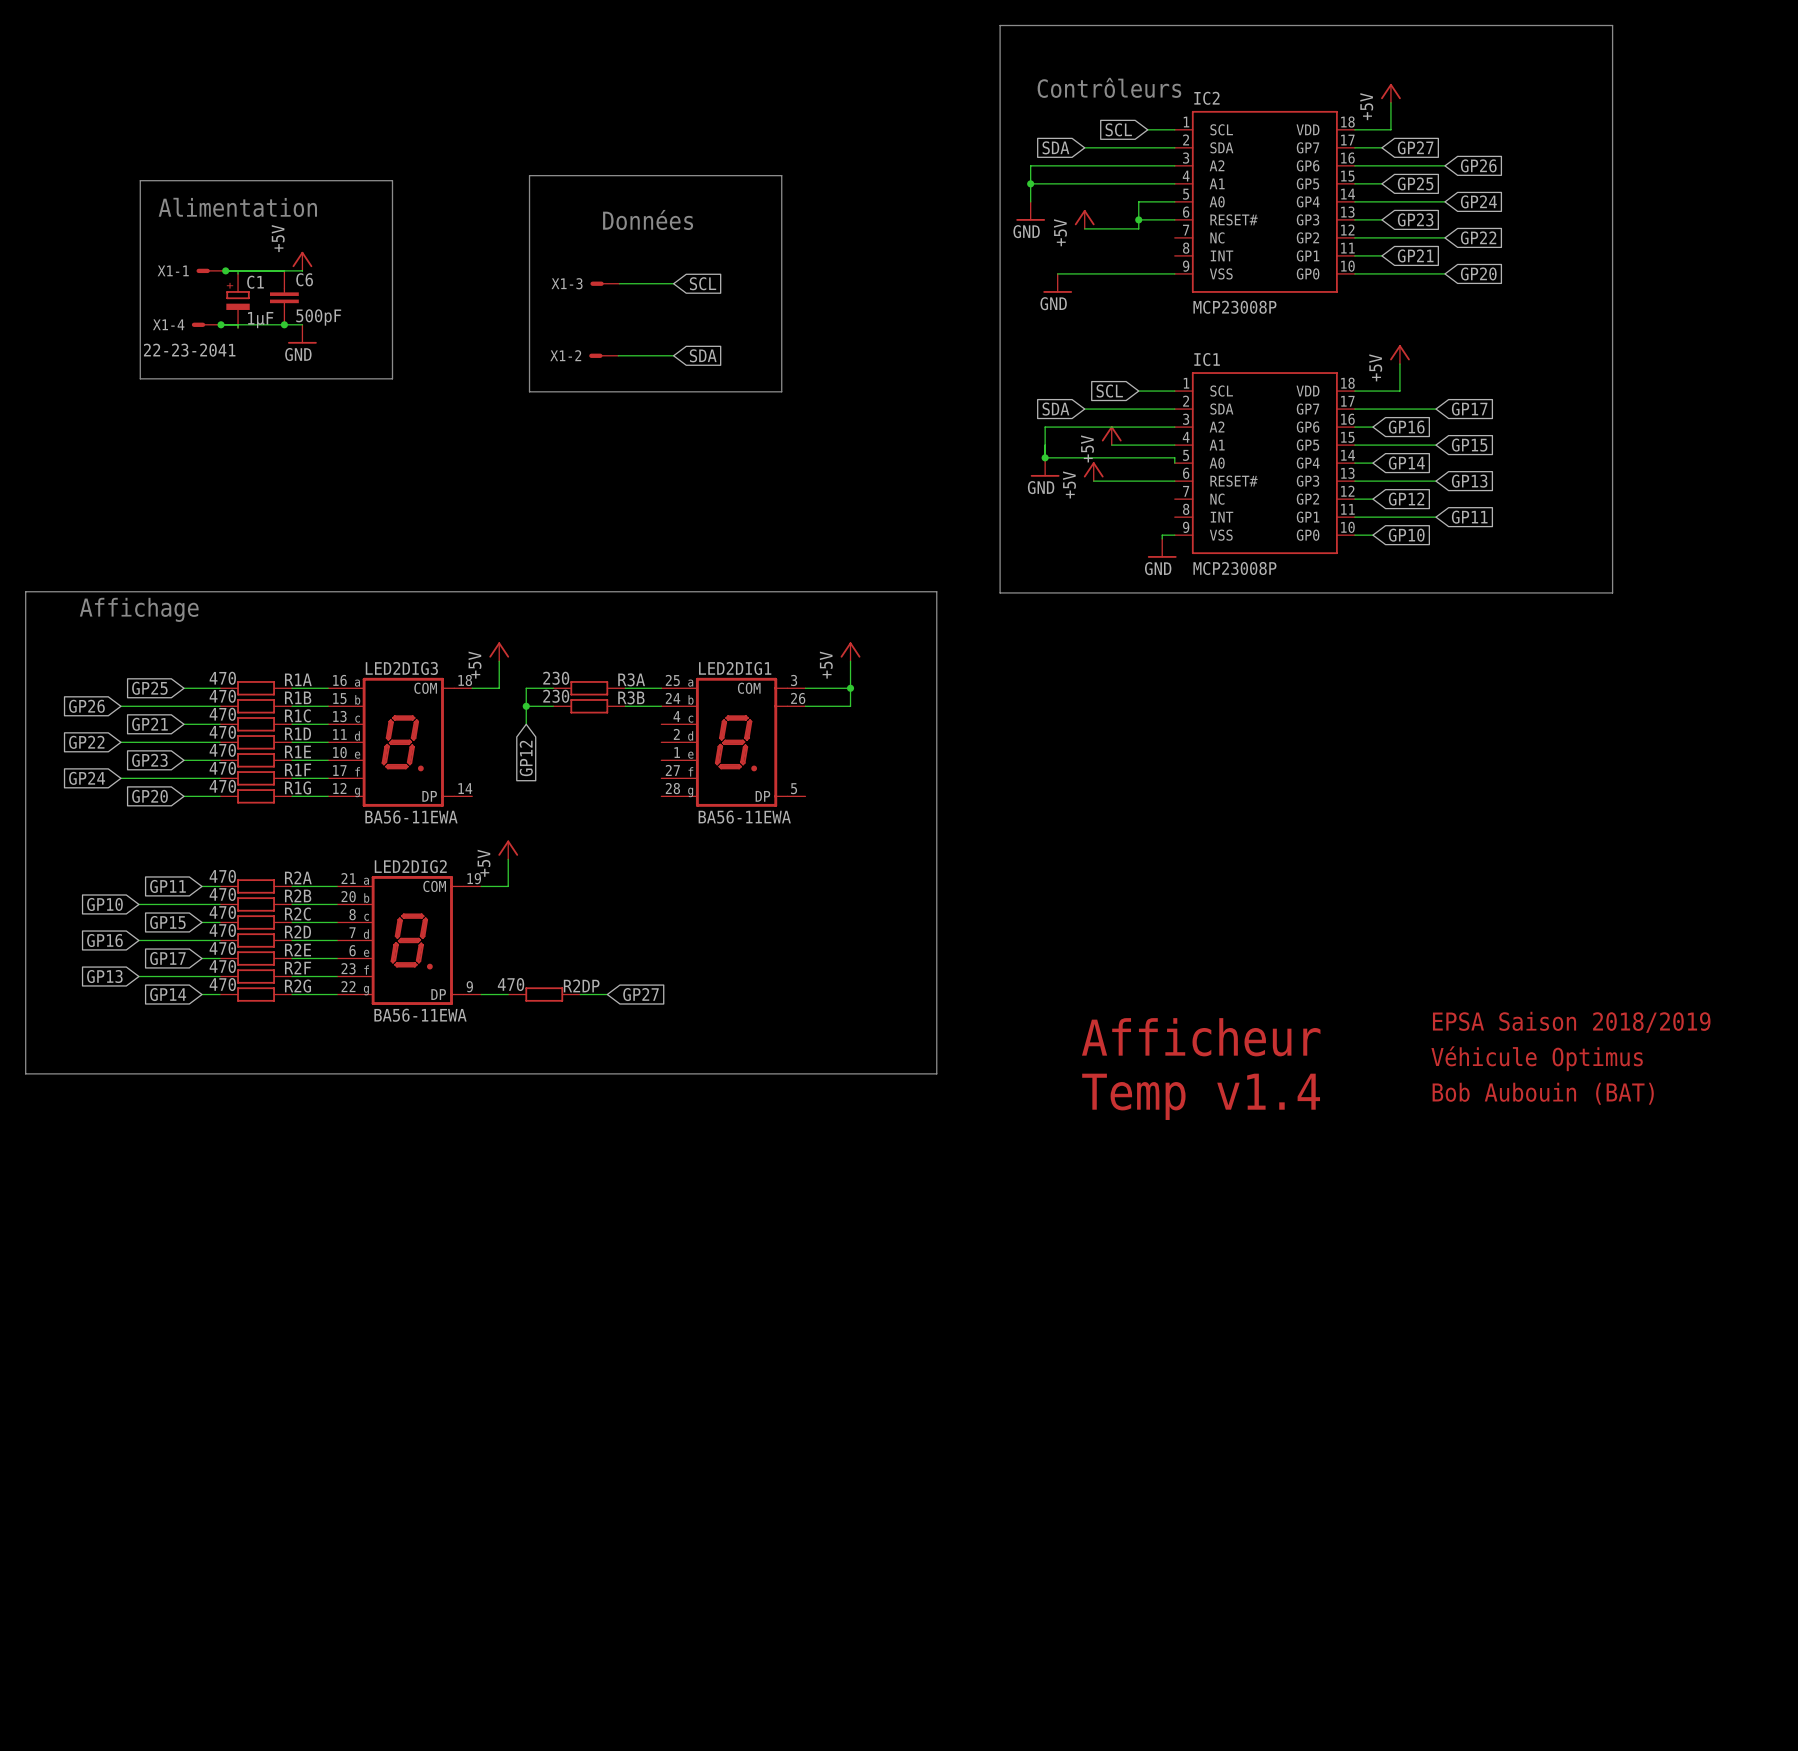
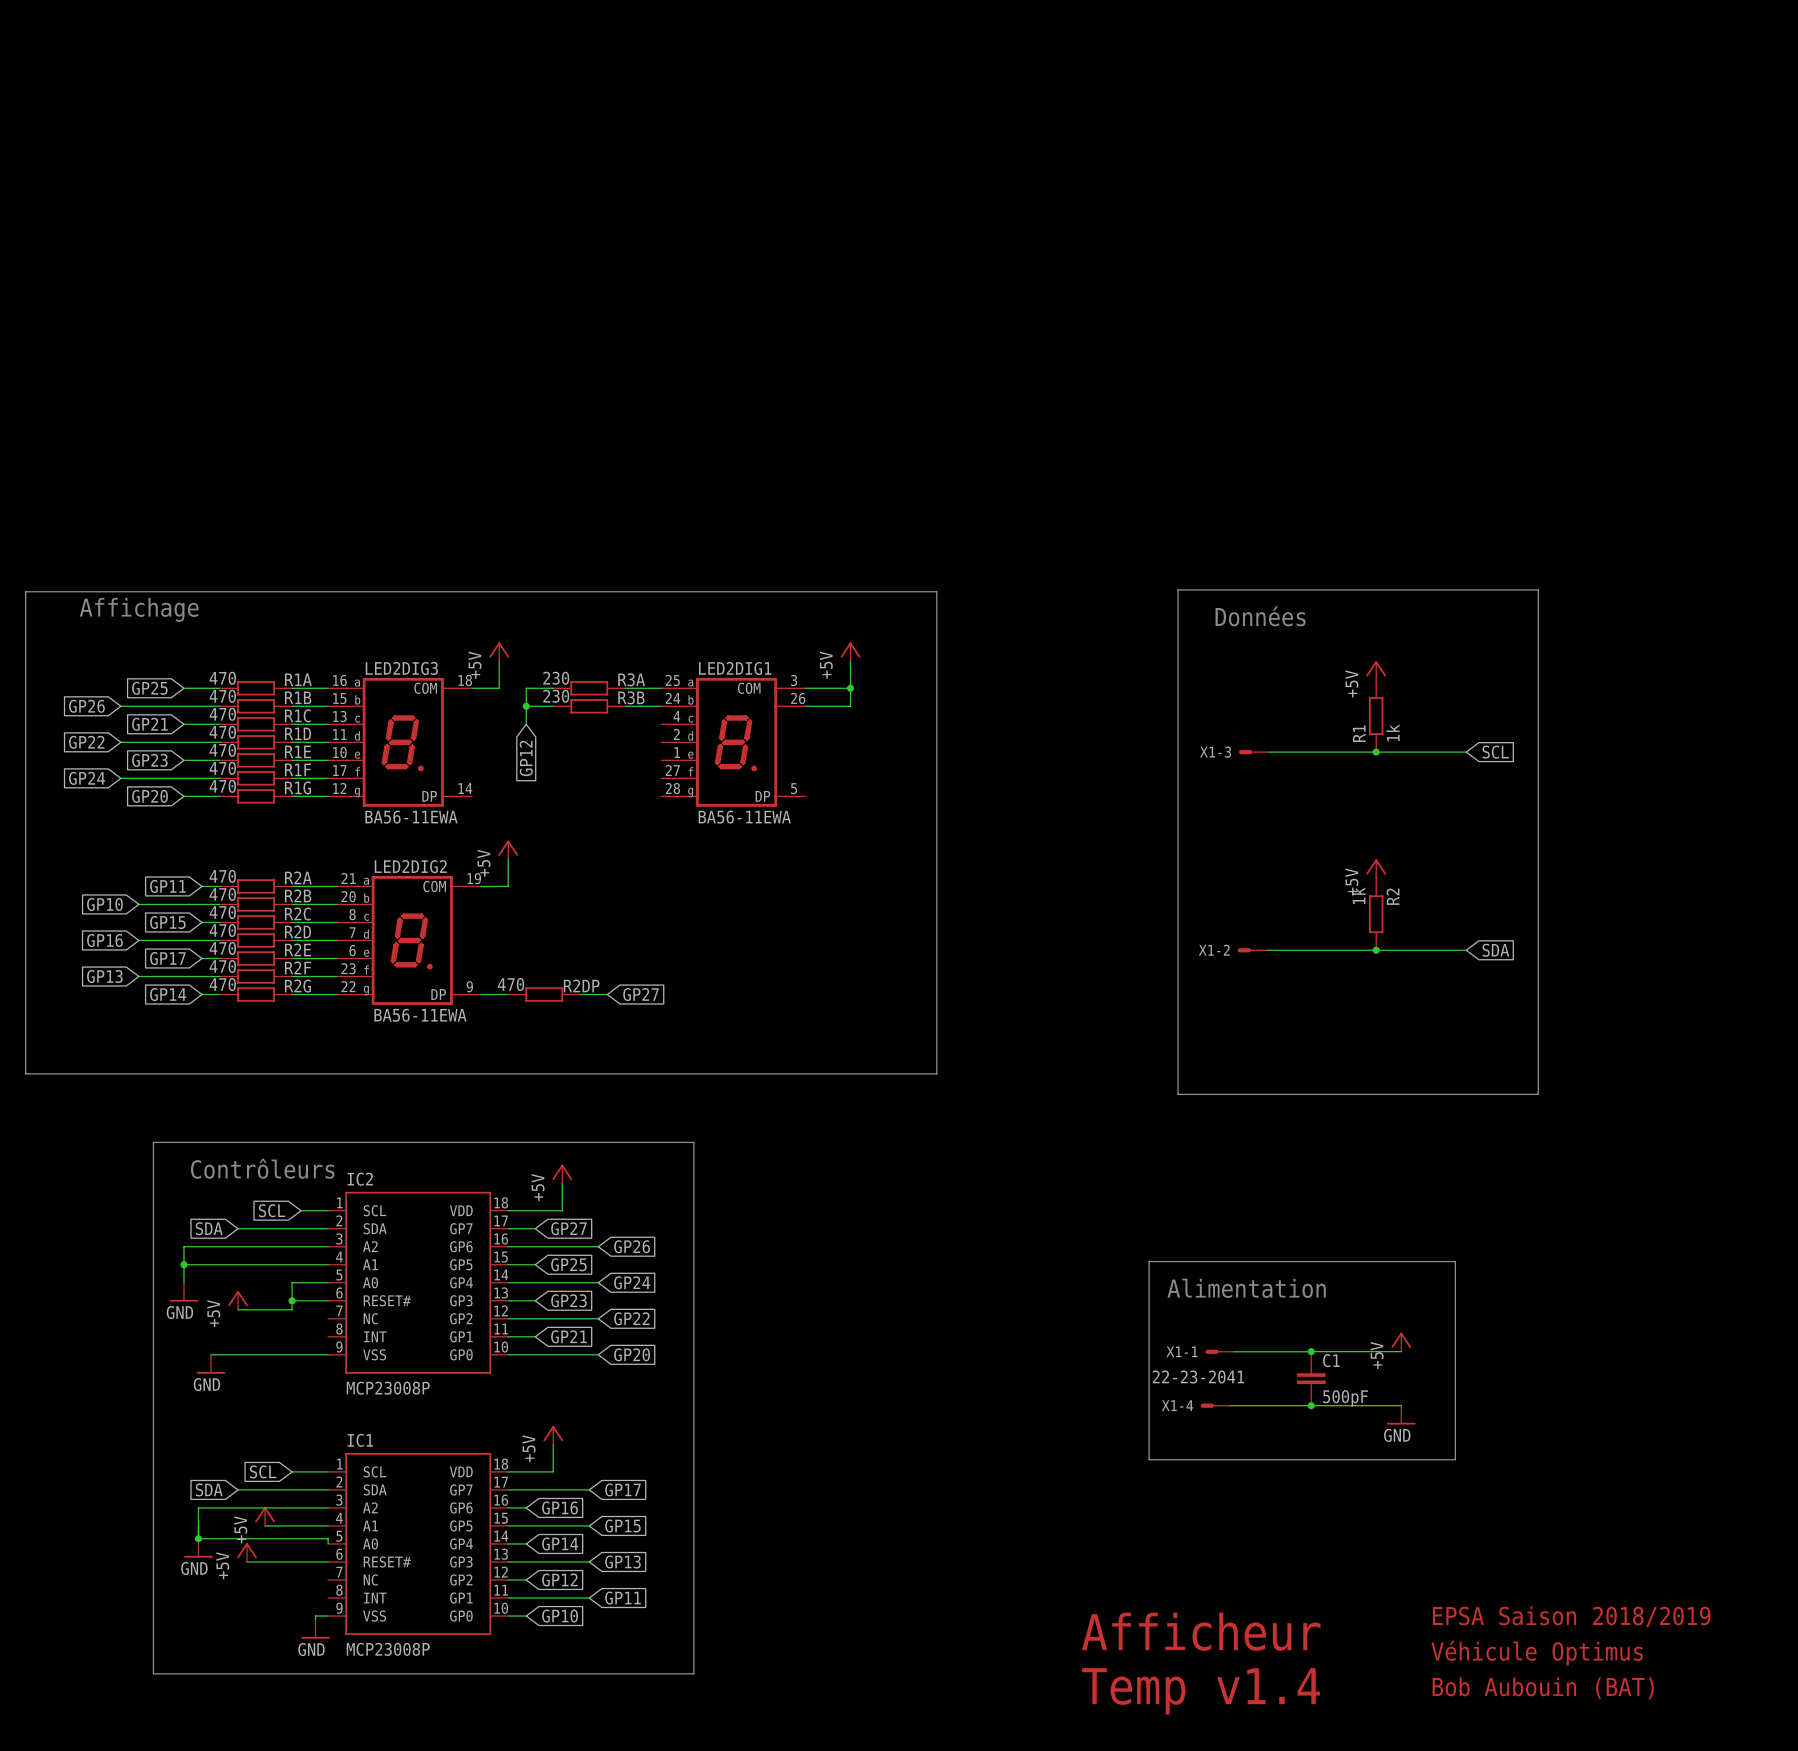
line: (1000, 25) (1612, 25) (1612, 592) (1000, 592) (1000, 25) -> none
text: Contrôleurs (1109, 87) -> none
power symbol: +5V (1390, 93) -> none
wire: (1390, 102) (1390, 129) (1354, 129) -> none
global label: SCL (1118, 129) -> none
wire: (1147, 129) (1174, 129) -> none
global label: SDA (1055, 147) -> none
wire: (1084, 147) (1174, 147) -> none
wire: (1354, 147) (1381, 147) -> none
global label: GP27 (1415, 147) -> none
wire: (1174, 165) (1030, 165) (1030, 201) -> none
wire: (1354, 165) (1445, 165) -> none
global label: GP26 (1478, 165) -> none
line: (529, 175) (529, 391) (781, 391) (781, 175) (529, 175) -> none
line: (140, 180) (140, 378) (392, 378) (392, 180) (140, 180) -> none
wire: (1030, 183) (1174, 183) -> none
junction: (1030, 183) -> none
wire: (1354, 183) (1381, 183) -> none
global label: GP25 (1415, 183) -> none
wire: (1174, 201) (1138, 201) (1138, 228) (1084, 228) -> none
IC2 position: (1264, 201) -> (418, 1282)
wire: (1354, 201) (1445, 201) -> none
global label: GP24 (1478, 201) -> none
text: Alimentation (237, 207) -> none
power symbol: GND (1030, 211) -> none
text: Données (648, 219) -> none
power symbol: +5V (1084, 219) -> none
wire: (1138, 219) (1174, 219) -> none
junction: (1138, 219) -> none
wire: (1354, 219) (1381, 219) -> none
global label: GP23 (1415, 219) -> none
wire: (1354, 237) (1445, 237) -> none
global label: GP22 (1478, 237) -> none
wire: (1354, 255) (1381, 255) -> none
global label: GP21 (1415, 255) -> none
power symbol: +5V (302, 261) -> none
X1-1 position: (211, 270) -> (1219, 1351)
wire: (225, 270) (302, 270) -> none
junction: (225, 270) -> none
wire: (238, 270) (238, 273) -> none
C1 symbol: [226, 273, 250, 328] -> [1296, 1351, 1326, 1406]
wire: (1057, 273) (1174, 273) -> none
wire: (1354, 273) (1445, 273) -> none
global label: GP20 (1478, 273) -> none
X1-3 position: (605, 283) -> (1253, 752)
wire: (619, 283) (673, 283) -> none
global label: SCL (702, 283) -> none
power symbol: GND (1057, 283) -> none
C6: 500pF (284, 297) -> none
C1 value: 1µF (260, 320) -> 500pF (1345, 1398)
X1-4 position: (206, 324) -> (1215, 1405)
wire: (221, 324) (302, 324) -> none
junction: (221, 324) -> none
wire: (238, 324) (238, 327) -> none
junction: (284, 324) -> none
power symbol: GND (302, 334) -> none
X1-1 value position: 22-23-2041 (189, 350) -> 22-23-2041 (1198, 1377)
power symbol: +5V (1399, 354) -> none
X1-2 position: (603, 355) -> (1252, 950)
wire: (618, 355) (673, 355) -> none
global label: SDA (703, 355) -> none
wire: (1399, 364) (1399, 391) (1354, 391) -> none
global label: SCL (1109, 391) -> none
wire: (1138, 391) (1174, 391) -> none
global label: SDA (1055, 409) -> none
wire: (1084, 409) (1174, 409) -> none
wire: (1354, 409) (1435, 409) -> none
global label: GP17 (1469, 409) -> none
wire: (1174, 427) (1045, 427) (1045, 457) (1174, 457) (1174, 463) -> none
wire: (1354, 427) (1372, 427) -> none
global label: GP16 (1406, 427) -> none
power symbol: +5V (1111, 435) -> none
wire: (1111, 445) (1174, 445) -> none
wire: (1354, 445) (1435, 445) -> none
global label: GP15 (1469, 445) -> none
junction: (1045, 457) -> none
IC1 position: (1264, 463) -> (418, 1543)
wire: (1354, 463) (1372, 463) -> none
global label: GP14 (1406, 463) -> none
power symbol: GND (1045, 467) -> none
power symbol: +5V (1093, 471) -> none
wire: (1093, 481) (1174, 481) -> none
wire: (1354, 481) (1435, 481) -> none
global label: GP13 (1469, 481) -> none
wire: (1354, 499) (1372, 499) -> none
global label: GP12 (1406, 499) -> none
wire: (1354, 517) (1435, 517) -> none
global label: GP11 (1469, 517) -> none
wire: (1174, 535) (1162, 535) (1162, 538) -> none
wire: (1354, 535) (1372, 535) -> none
global label: GP10 (1406, 535) -> none
power symbol: GND (1162, 548) -> none
line: none -> (1178, 589) (1178, 1094) (1538, 1094) (1538, 589) (1178, 589)
text: none -> Données (1260, 616)
power symbol: none -> +5V (1376, 670)
R1: none -> 1k (1376, 716)
wire: none -> (1268, 752) (1466, 752)
junction: none -> (1376, 752)
global label: none -> SCL (1495, 752)
power symbol: none -> +5V (1376, 868)
R2: none -> 1k (1376, 914)
wire: none -> (1266, 950) (1466, 950)
junction: none -> (1376, 950)
global label: none -> SDA (1495, 950)
text: EPSA Saison 2018/2019 (1571, 1022) -> none
text: Afficheur (1201, 1037) -> none
text: Véhicule Optimus (1537, 1058) -> none
text: Bob Aubouin (BAT) (1543, 1093) -> none
text: Temp v1.4 (1201, 1096) -> none
line: none -> (153, 1142) (693, 1142) (693, 1673) (153, 1673) (153, 1142)
text: none -> Contrôleurs (262, 1168)
power symbol: none -> +5V (562, 1174)
wire: none -> (562, 1183) (562, 1210) (508, 1210)
global label: none -> SCL (272, 1210)
wire: none -> (301, 1210) (328, 1210)
global label: none -> SDA (209, 1228)
wire: none -> (238, 1228) (328, 1228)
wire: none -> (508, 1228) (535, 1228)
global label: none -> GP27 (568, 1228)
wire: none -> (328, 1246) (183, 1246) (183, 1282)
wire: none -> (508, 1246) (598, 1246)
global label: none -> GP26 (632, 1246)
line: none -> (1149, 1261) (1149, 1459) (1455, 1459) (1455, 1261) (1149, 1261)
wire: none -> (183, 1264) (328, 1264)
junction: none -> (183, 1264)
wire: none -> (508, 1264) (535, 1264)
global label: none -> GP25 (568, 1264)
wire: none -> (328, 1282) (292, 1282) (292, 1309) (238, 1309)
wire: none -> (508, 1282) (598, 1282)
global label: none -> GP24 (632, 1282)
text: none -> Alimentation (1246, 1288)
power symbol: none -> GND (183, 1292)
power symbol: none -> +5V (238, 1300)
wire: none -> (292, 1300) (328, 1300)
junction: none -> (292, 1300)
wire: none -> (508, 1300) (535, 1300)
global label: none -> GP23 (568, 1300)
wire: none -> (508, 1318) (598, 1318)
global label: none -> GP22 (631, 1318)
wire: none -> (508, 1336) (535, 1336)
global label: none -> GP21 (569, 1336)
power symbol: none -> +5V (1401, 1342)
wire: none -> (1234, 1351) (1311, 1351)
wire: none -> (1311, 1351) (1401, 1351)
junction: none -> (1311, 1351)
wire: none -> (211, 1354) (328, 1354)
wire: none -> (508, 1354) (598, 1354)
global label: none -> GP20 (632, 1354)
power symbol: none -> GND (211, 1364)
wire: none -> (1229, 1405) (1401, 1405)
junction: none -> (1311, 1405)
power symbol: none -> GND (1401, 1415)
power symbol: none -> +5V (553, 1435)
wire: none -> (553, 1444) (553, 1471) (508, 1471)
global label: none -> SCL (263, 1471)
wire: none -> (292, 1471) (328, 1471)
global label: none -> SDA (209, 1489)
wire: none -> (238, 1489) (328, 1489)
wire: none -> (508, 1489) (589, 1489)
global label: none -> GP17 (622, 1489)
wire: none -> (328, 1507) (198, 1507) (198, 1538) (328, 1538) (328, 1543)
wire: none -> (508, 1507) (526, 1507)
global label: none -> GP16 (560, 1507)
power symbol: none -> +5V (265, 1516)
wire: none -> (265, 1525) (328, 1525)
wire: none -> (508, 1525) (589, 1525)
global label: none -> GP15 (622, 1525)
junction: none -> (198, 1538)
wire: none -> (508, 1543) (526, 1543)
global label: none -> GP14 (560, 1543)
power symbol: none -> GND (198, 1548)
power symbol: none -> +5V (247, 1552)
wire: none -> (247, 1561) (328, 1561)
wire: none -> (508, 1561) (589, 1561)
global label: none -> GP13 (622, 1561)
wire: none -> (508, 1580) (526, 1580)
global label: none -> GP12 (559, 1580)
wire: none -> (508, 1598) (589, 1598)
global label: none -> GP11 (623, 1598)
wire: none -> (328, 1616) (315, 1616) (315, 1619)
wire: none -> (508, 1616) (526, 1616)
global label: none -> GP10 (560, 1616)
text: none -> EPSA Saison 2018/2019 (1571, 1616)
power symbol: none -> GND (315, 1629)
text: none -> Afficheur (1201, 1631)
text: none -> Véhicule Optimus (1537, 1653)
text: none -> Bob Aubouin (BAT) (1543, 1688)
text: none -> Temp v1.4 (1201, 1691)

